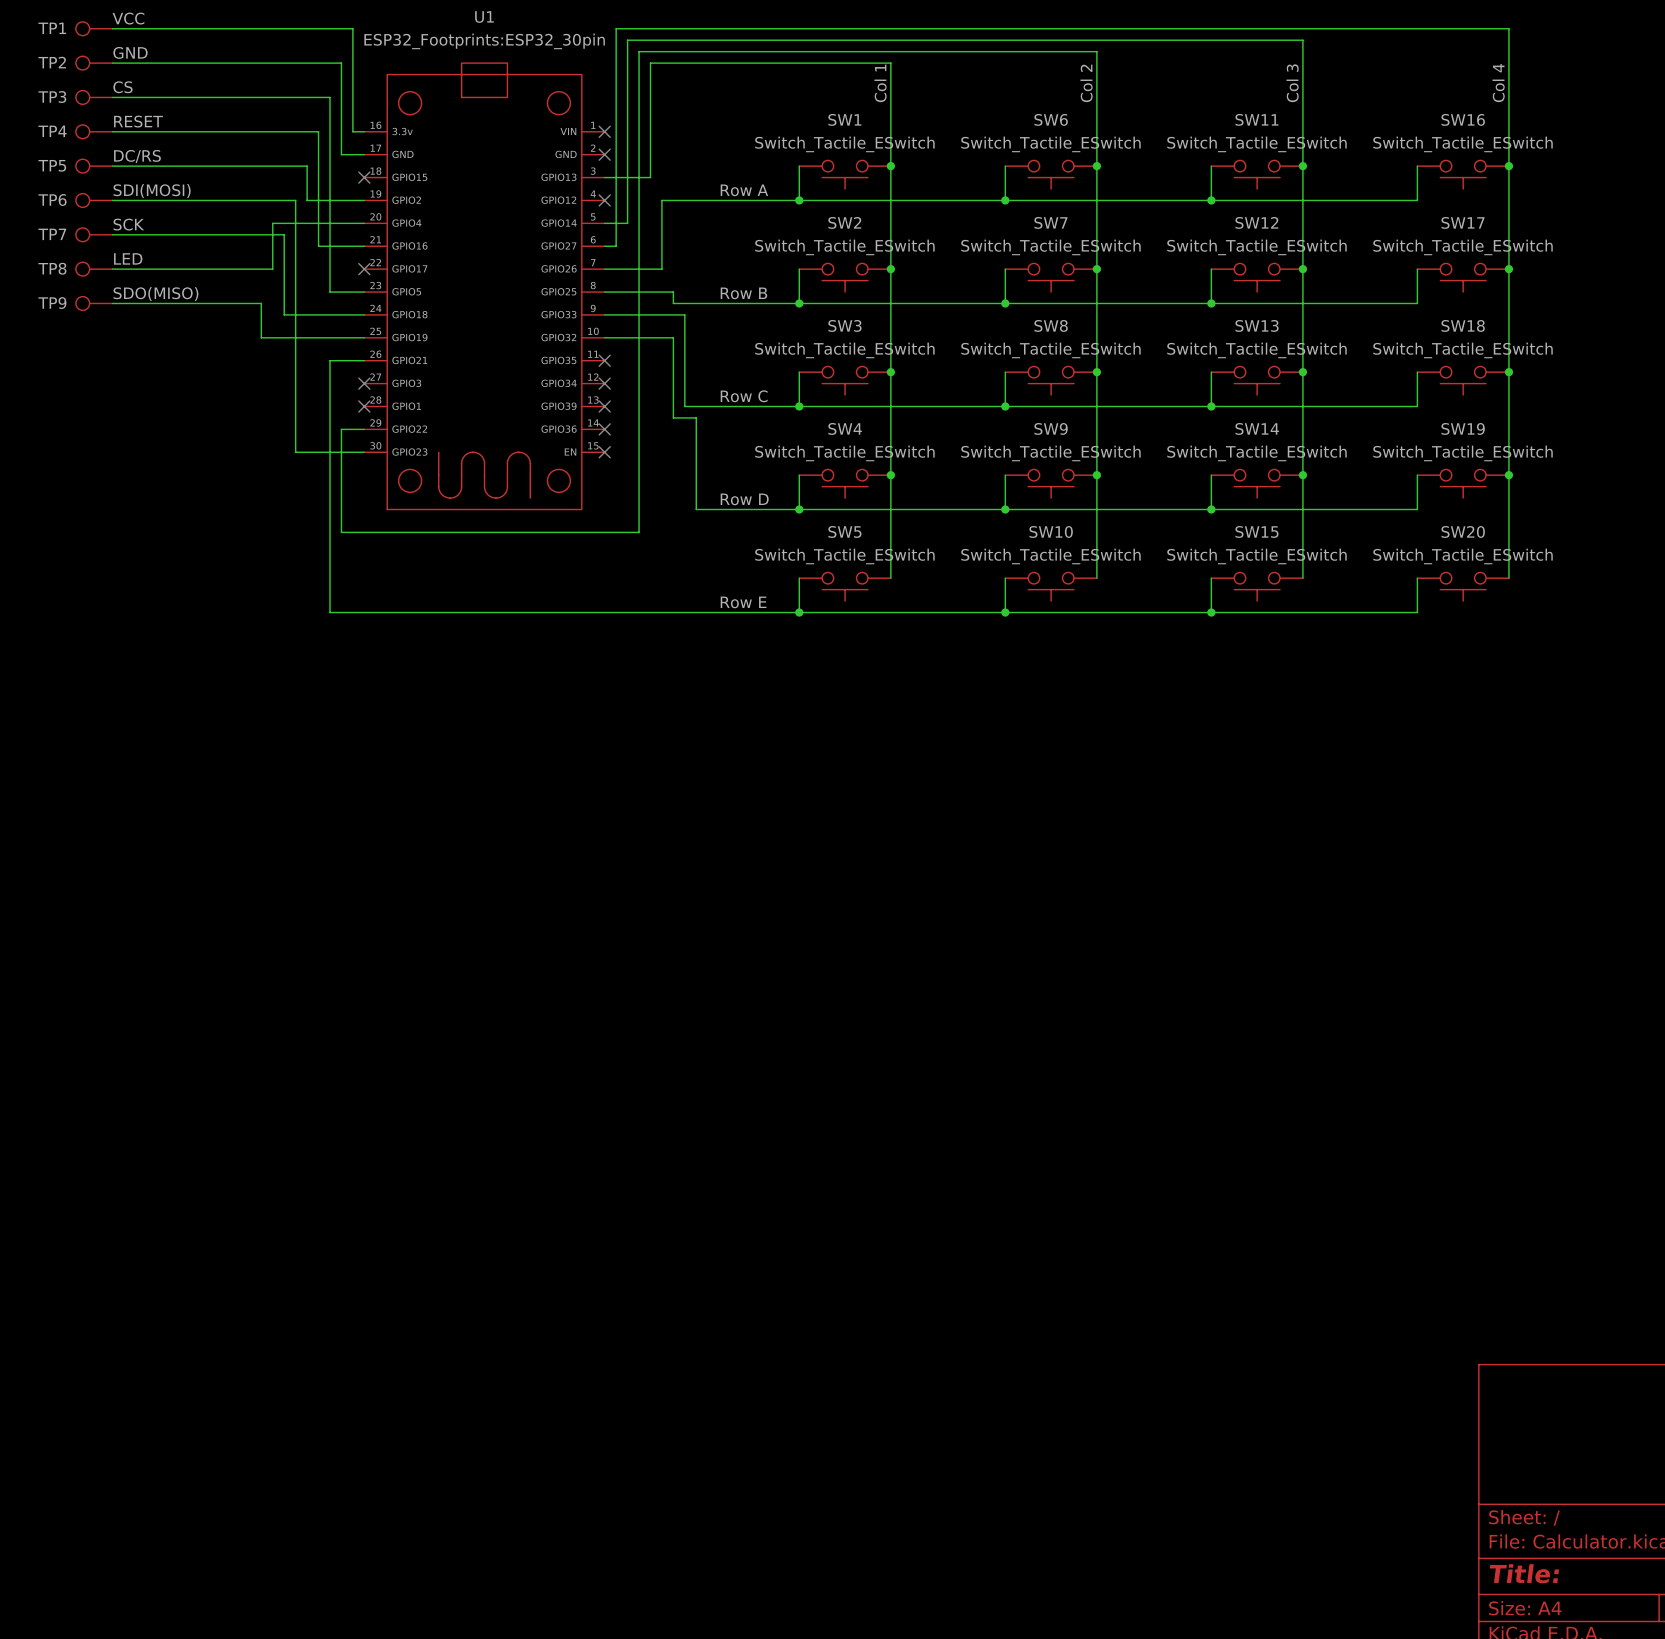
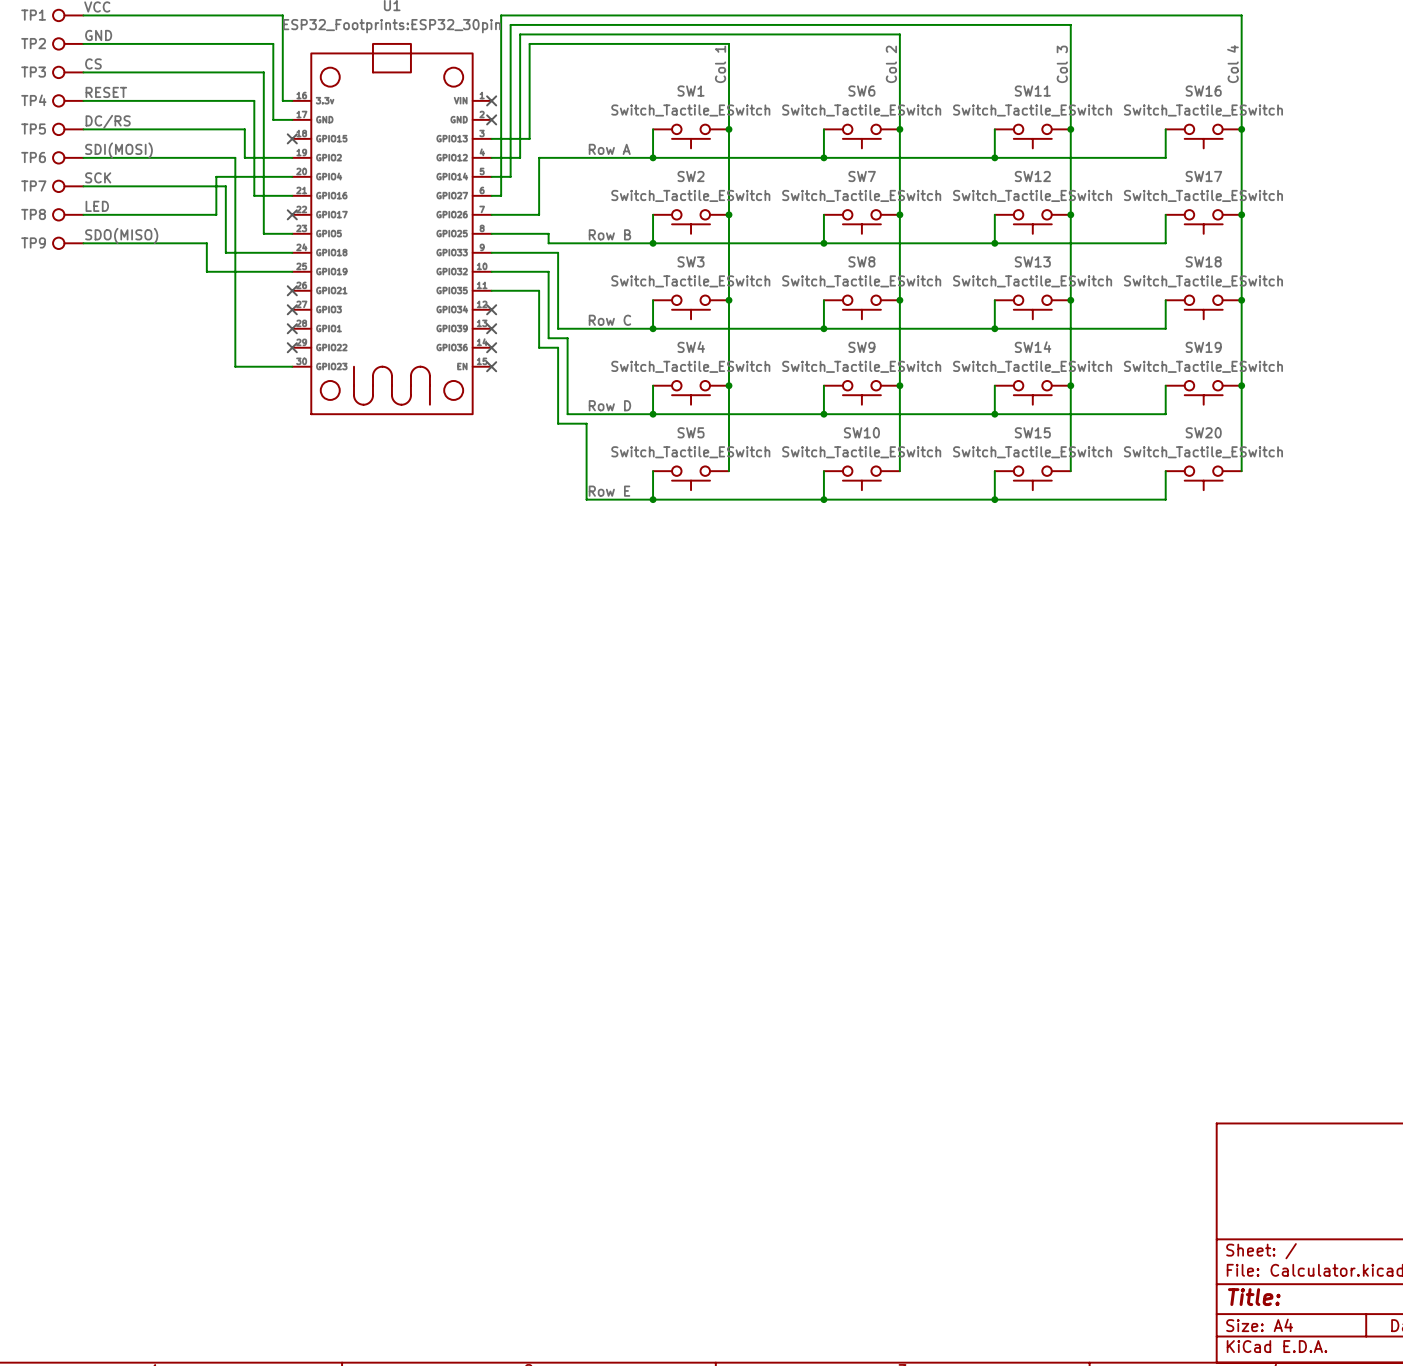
no-connect mark: (604, 200) -> none
wire: (639, 200) (639, 532) (341, 532) (341, 429) (364, 429) -> (520, 157) (491, 157)
wire: (364, 360) (330, 360) (330, 612) (719, 612) -> (491, 290) (539, 290) (539, 347) (558, 347) (558, 423) (586, 423) (586, 499)
no-connect mark: none -> (292, 290)
no-connect mark: (604, 360) -> none
no-connect mark: none -> (292, 347)

